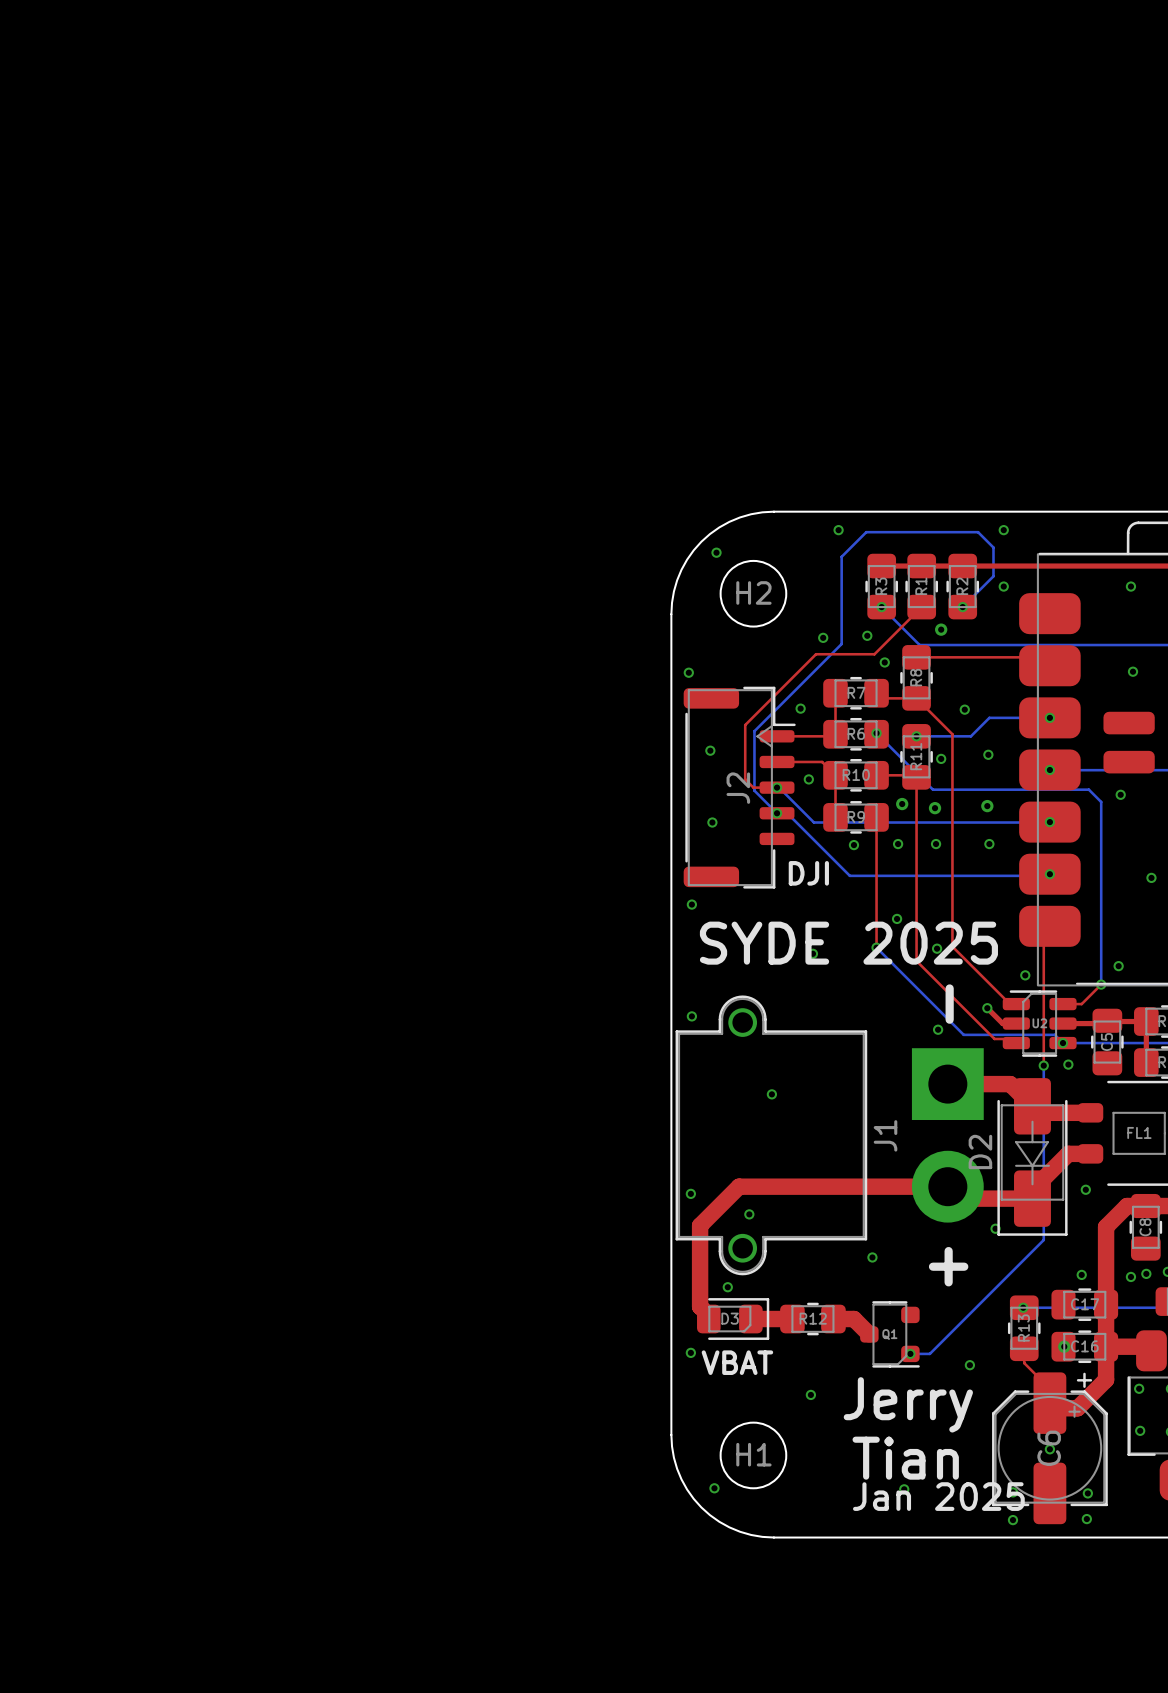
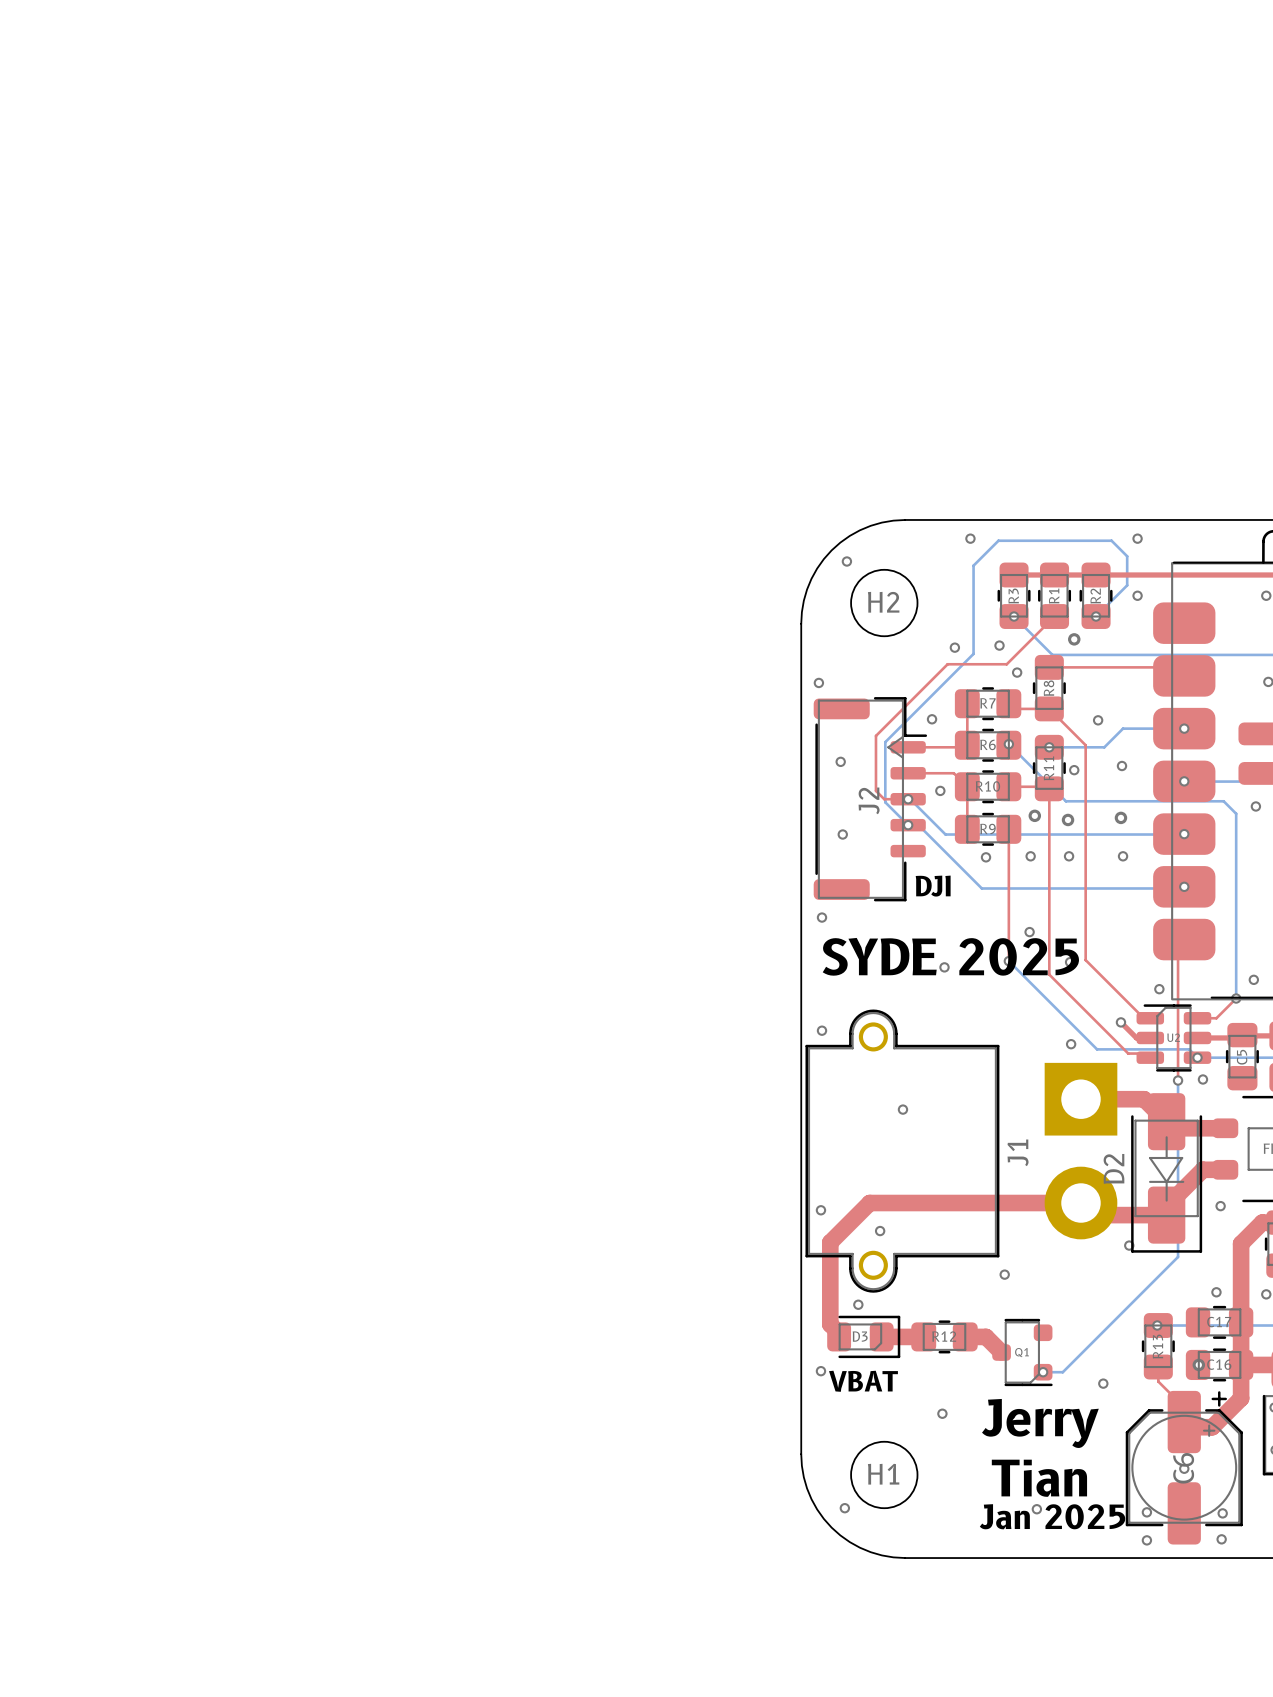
J1 text: - (949, 1004) -> none
J1 text: + (948, 1266) -> none

